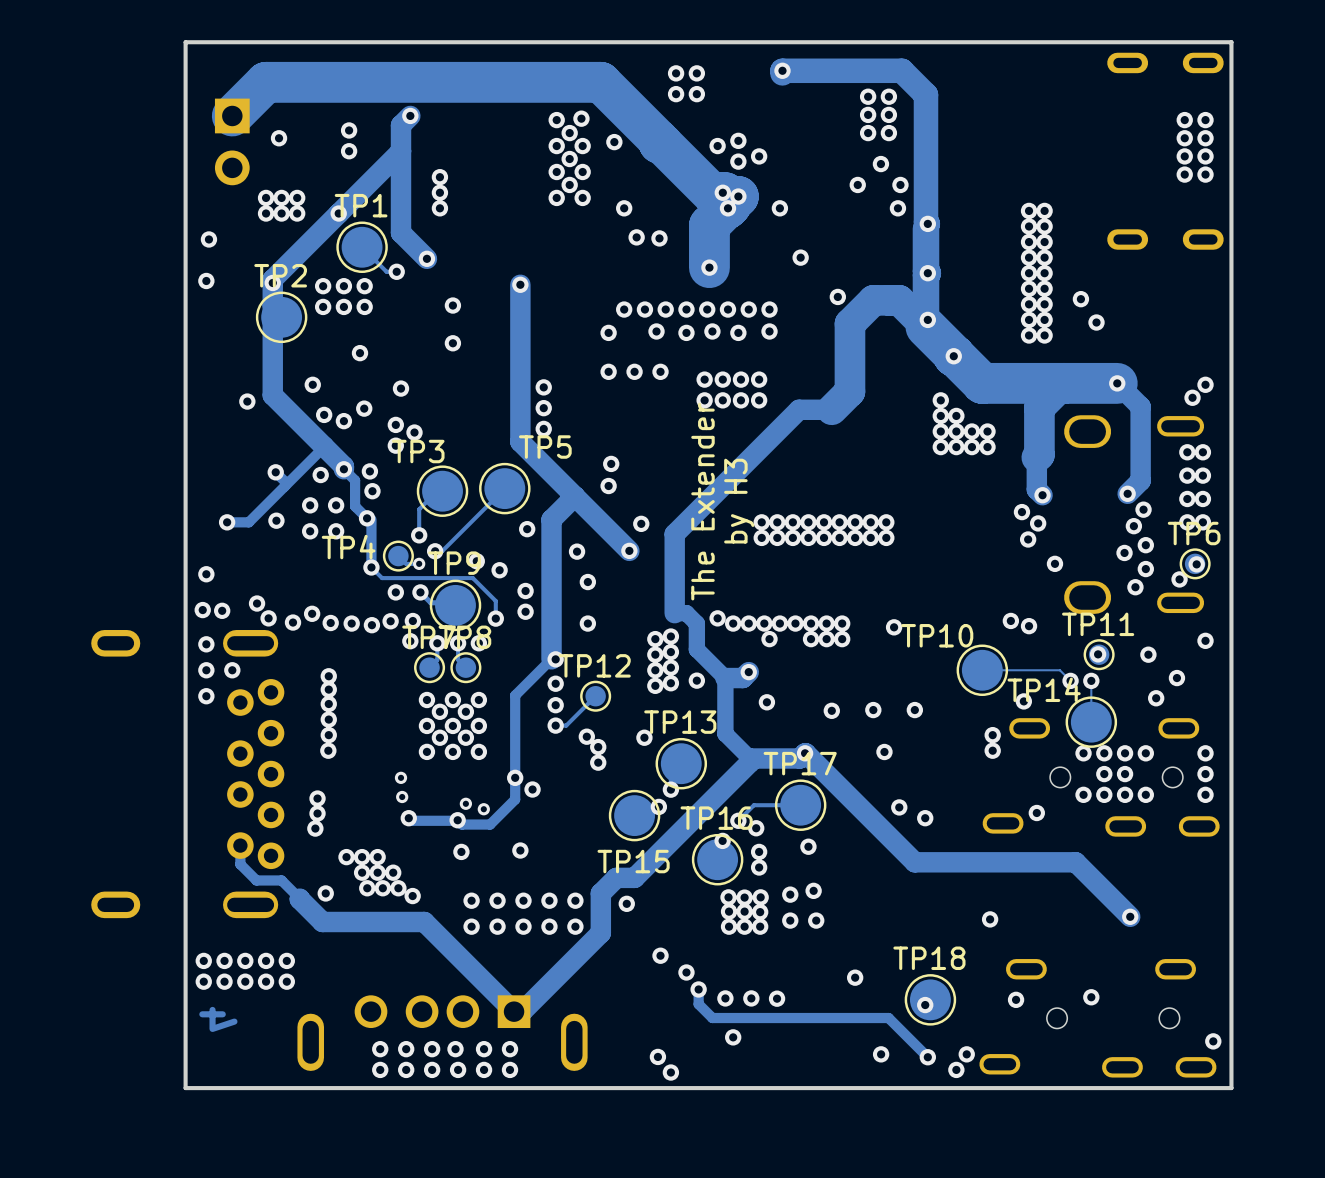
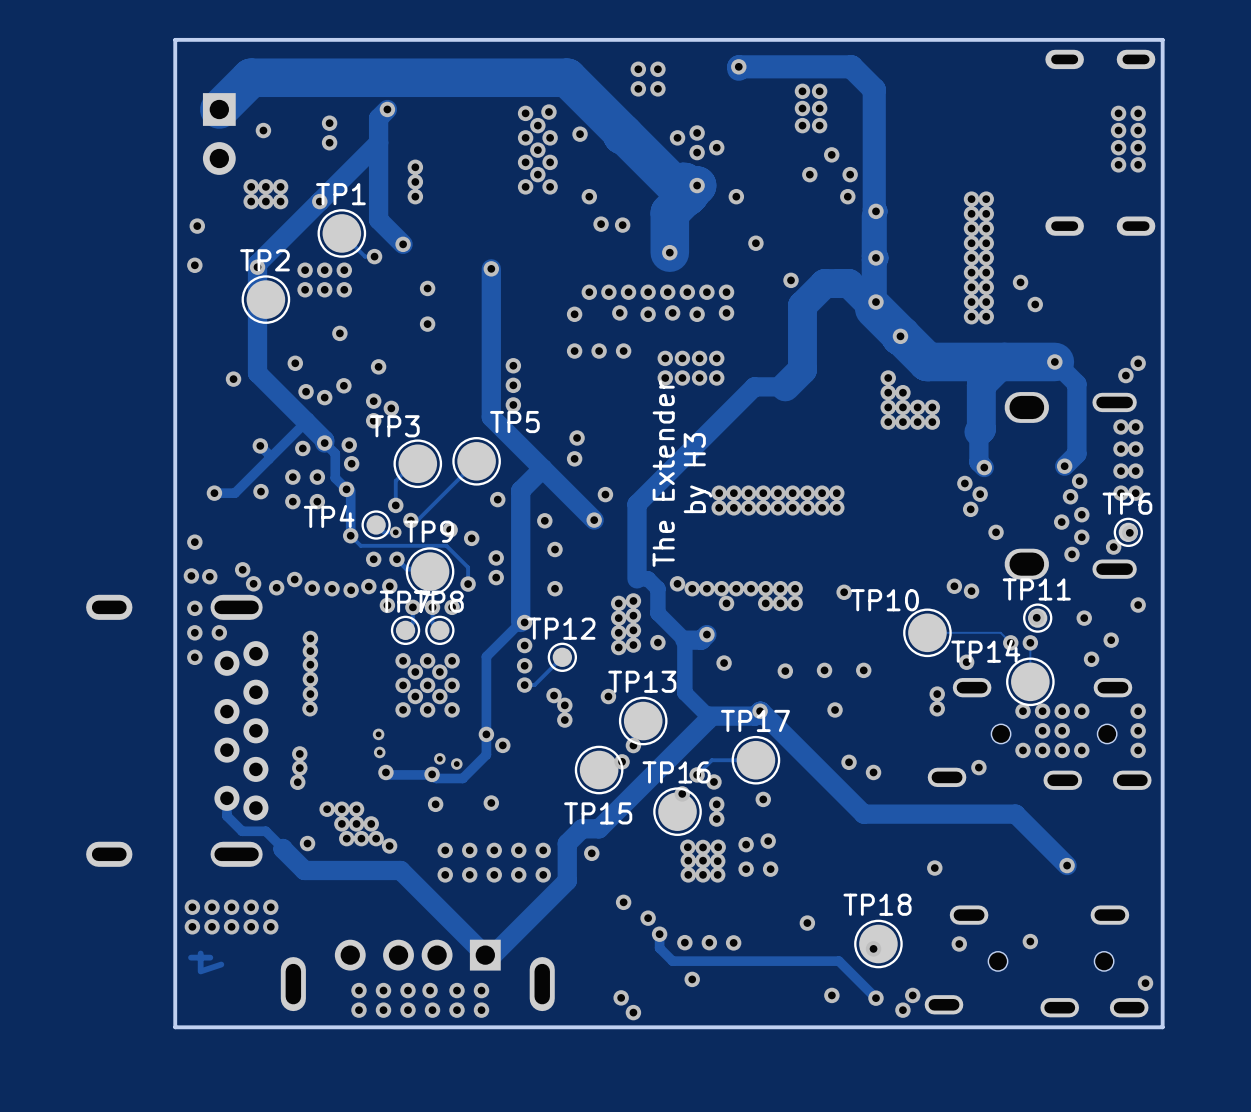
via: none -> (802, 91)
via: (888, 96) -> none
via: none -> (802, 108)
via: (888, 114) -> none
via: none -> (802, 125)
via: (888, 133) -> none
via: (722, 192) -> none
via: (727, 208) -> none

